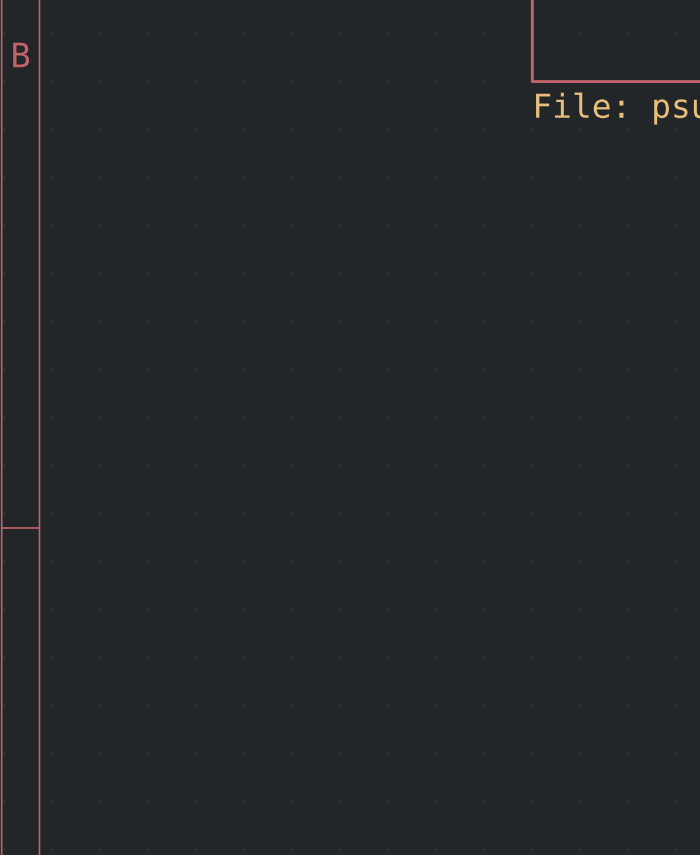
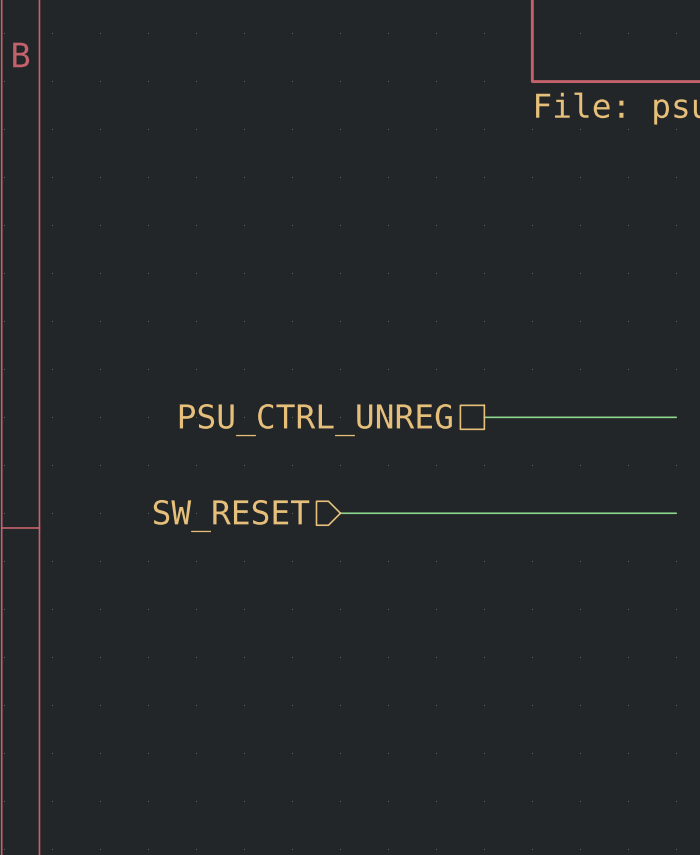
wire: none -> (484, 417) (676, 417)
hierarchical label: none -> PSU_CTRL_UNREG (315, 420)
wire: none -> (340, 513) (676, 513)
hierarchical label: none -> SW_RESET (231, 516)

